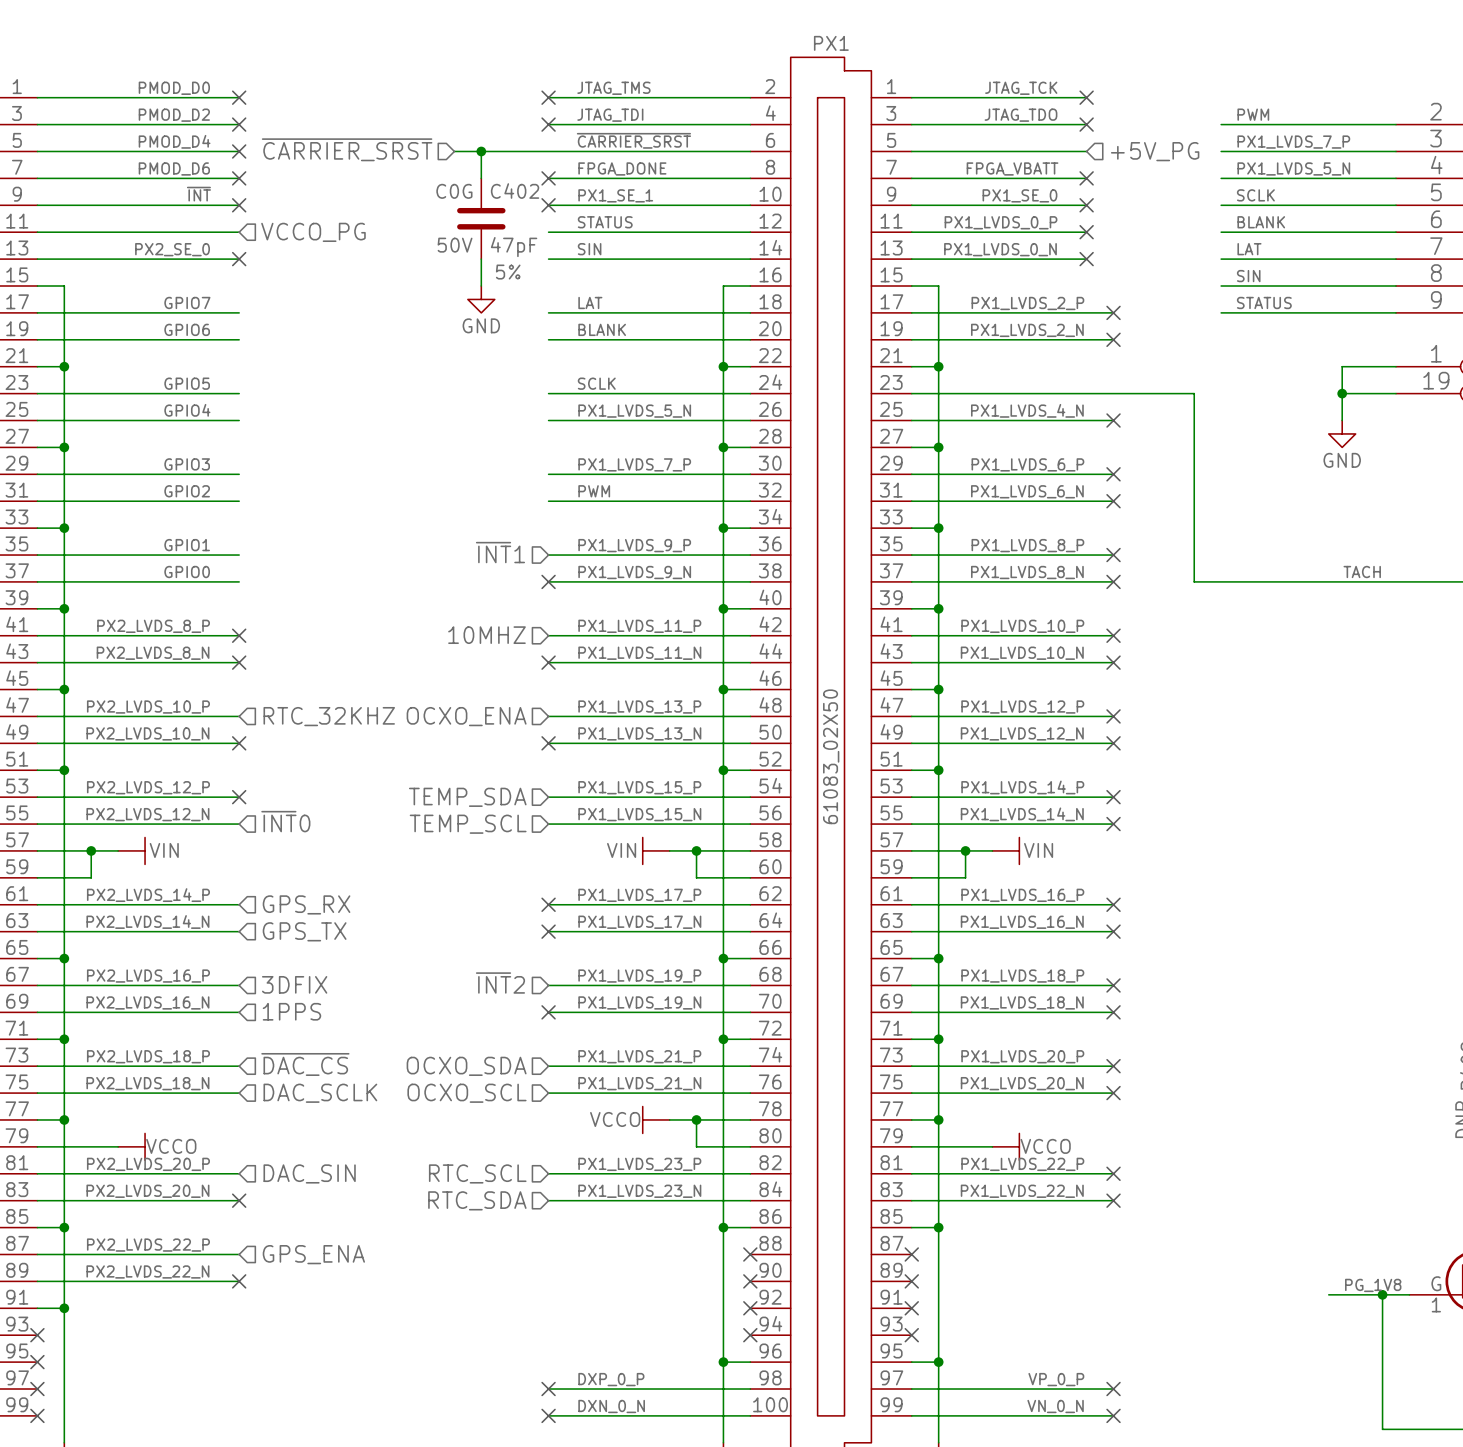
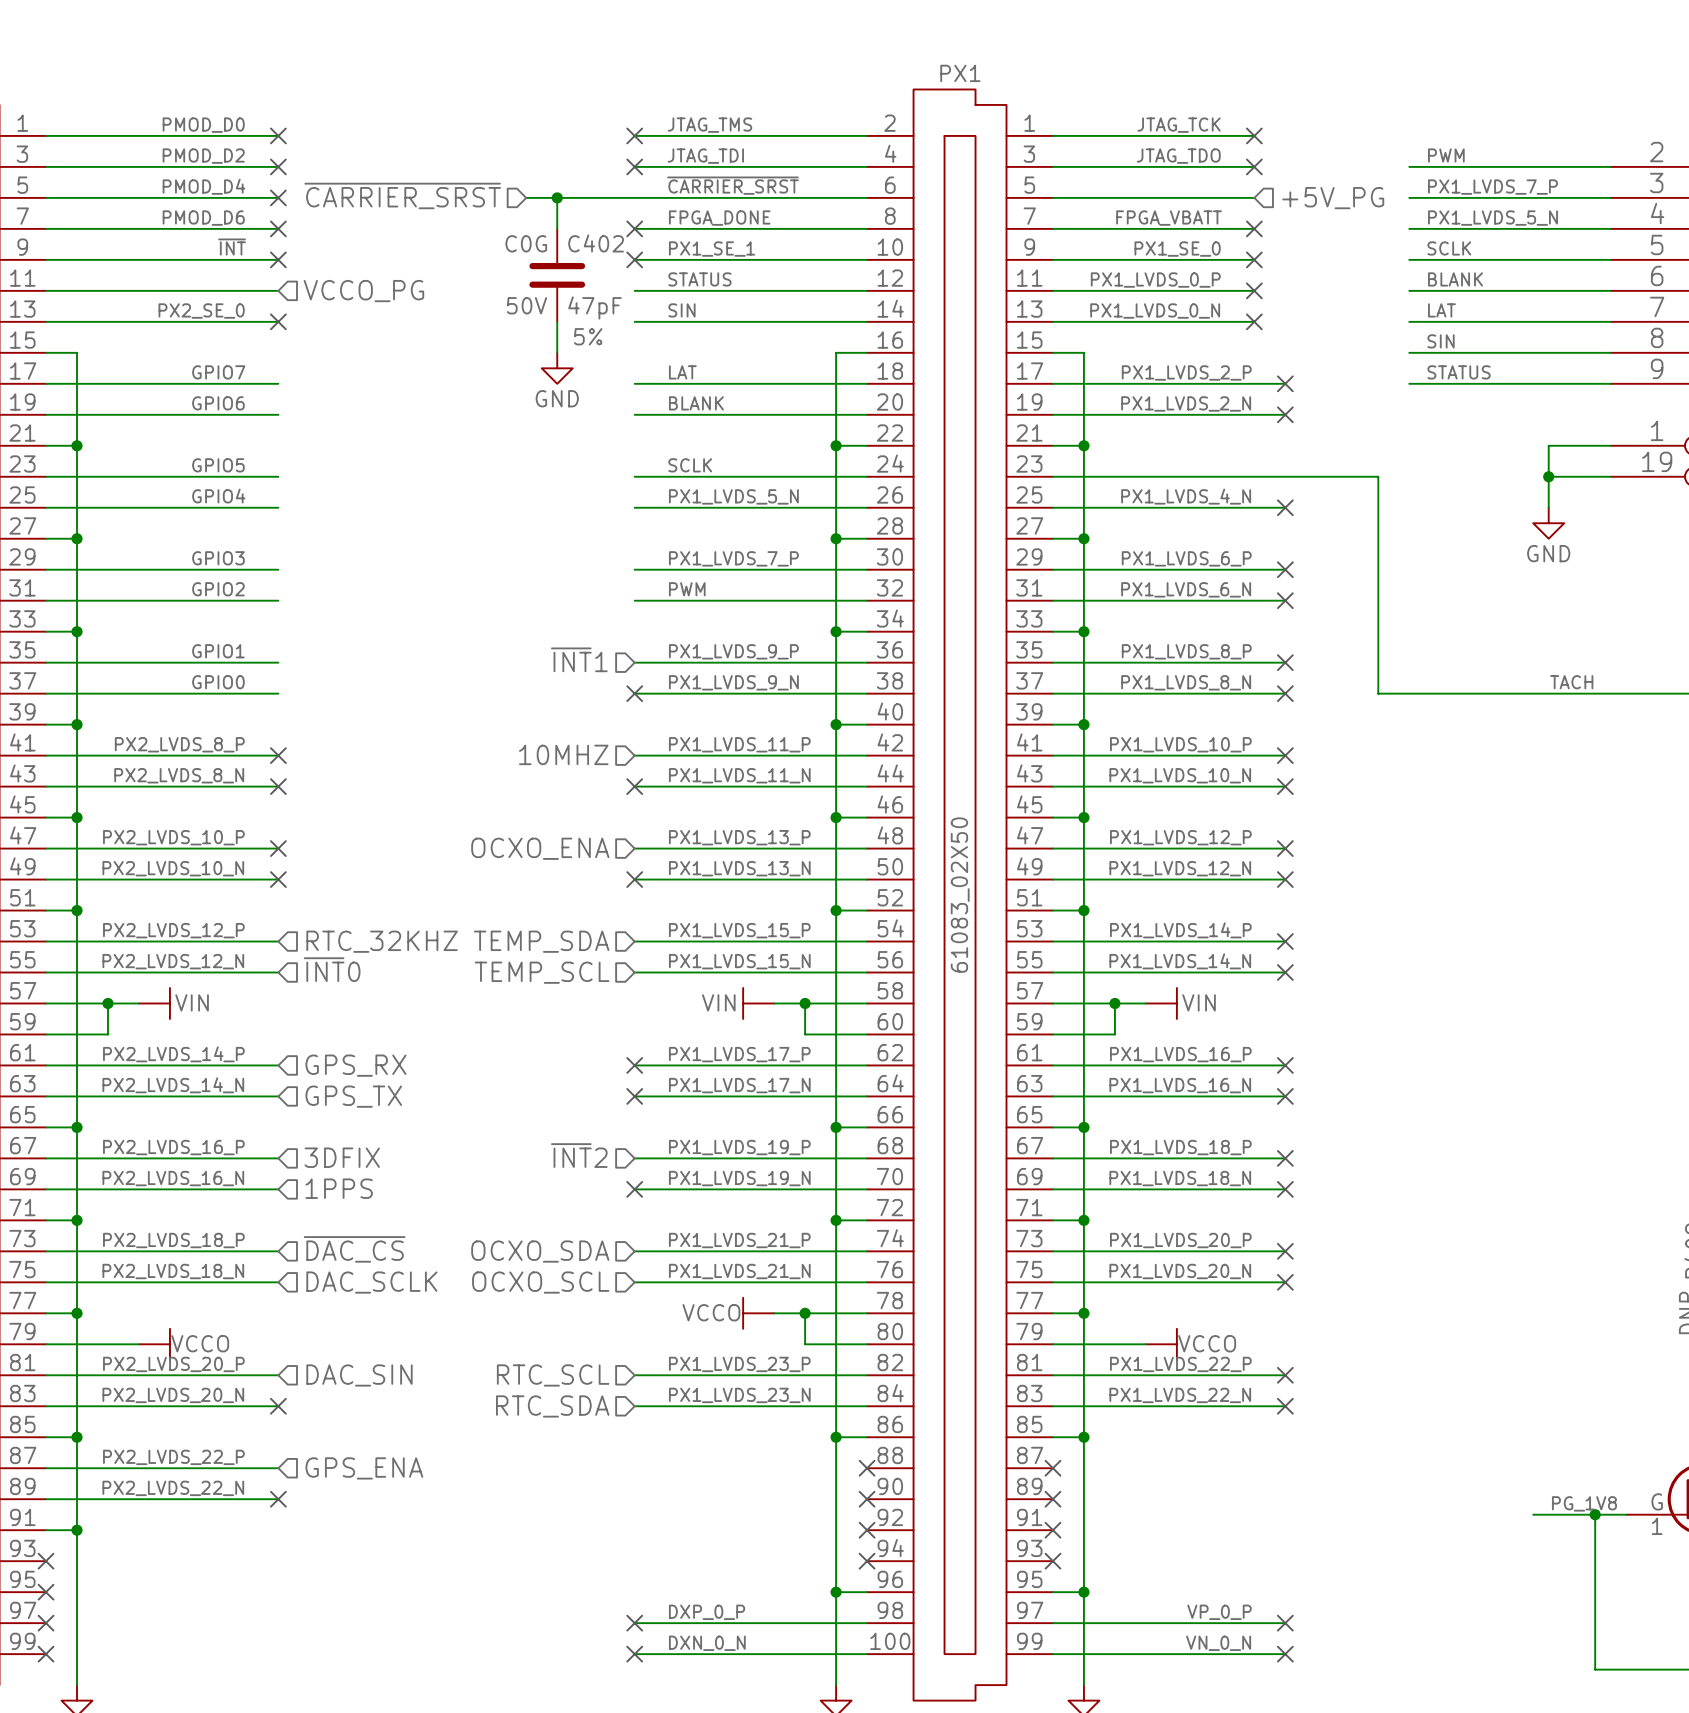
no-connect mark: none -> (278, 848)
hierarchical label position: RTC_32KHZ (329, 716) -> RTC_32KHZ (382, 941)
no-connect mark: (239, 797) -> none

